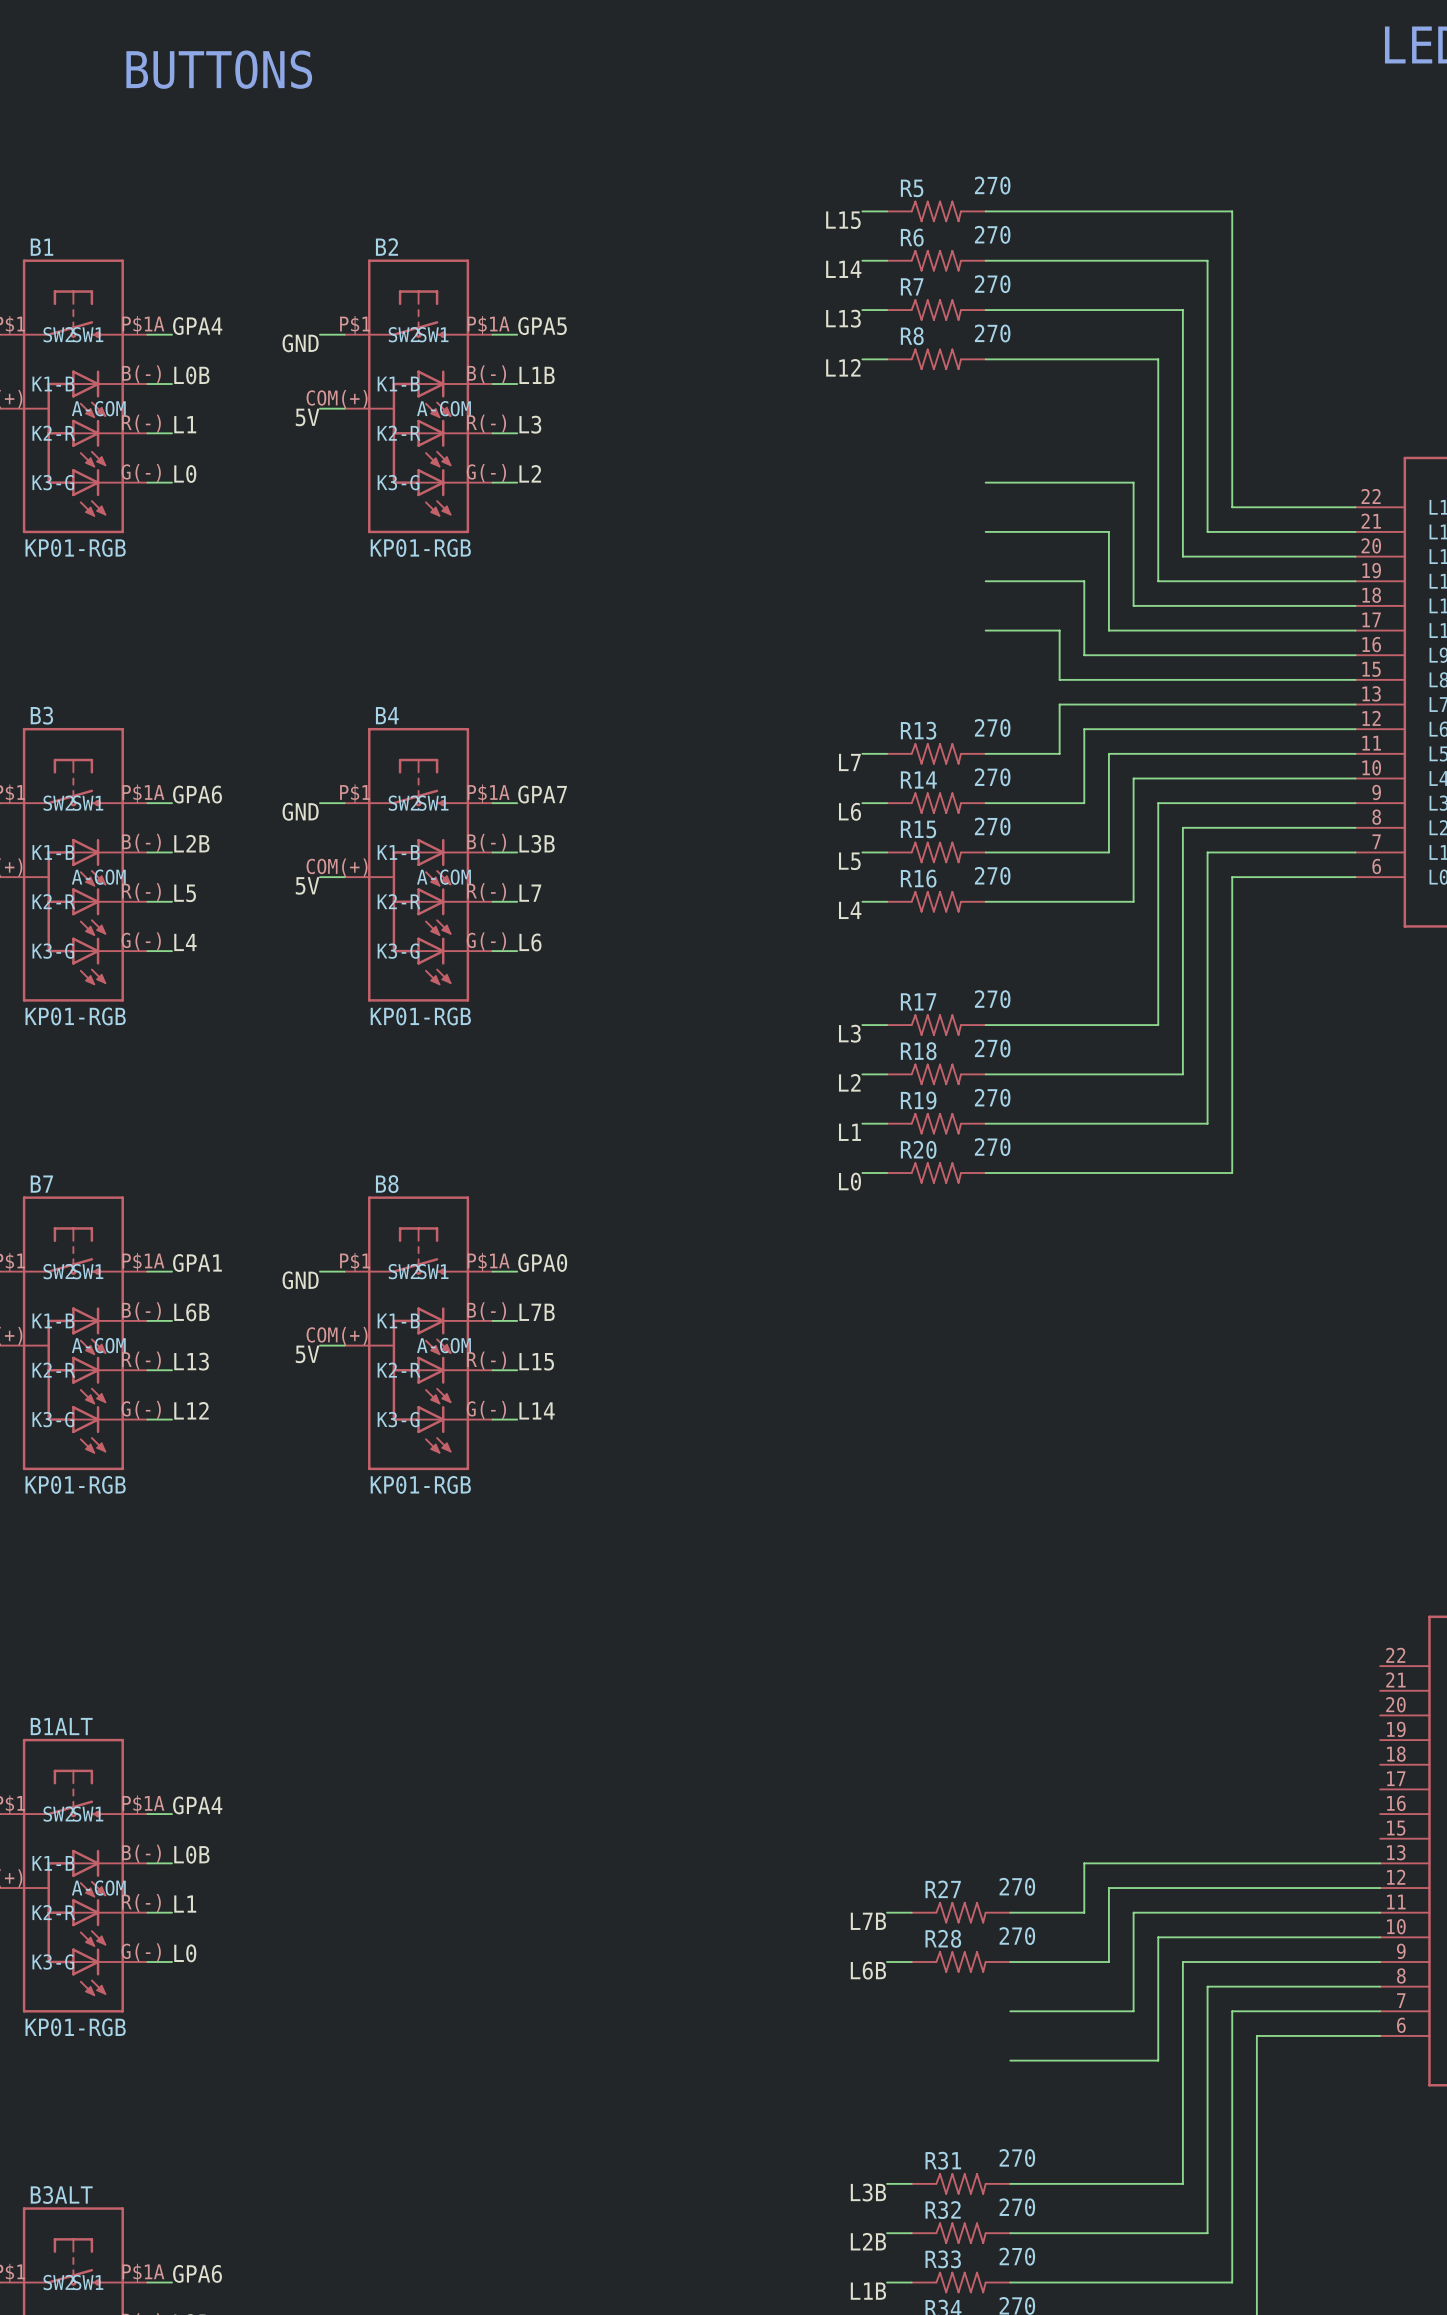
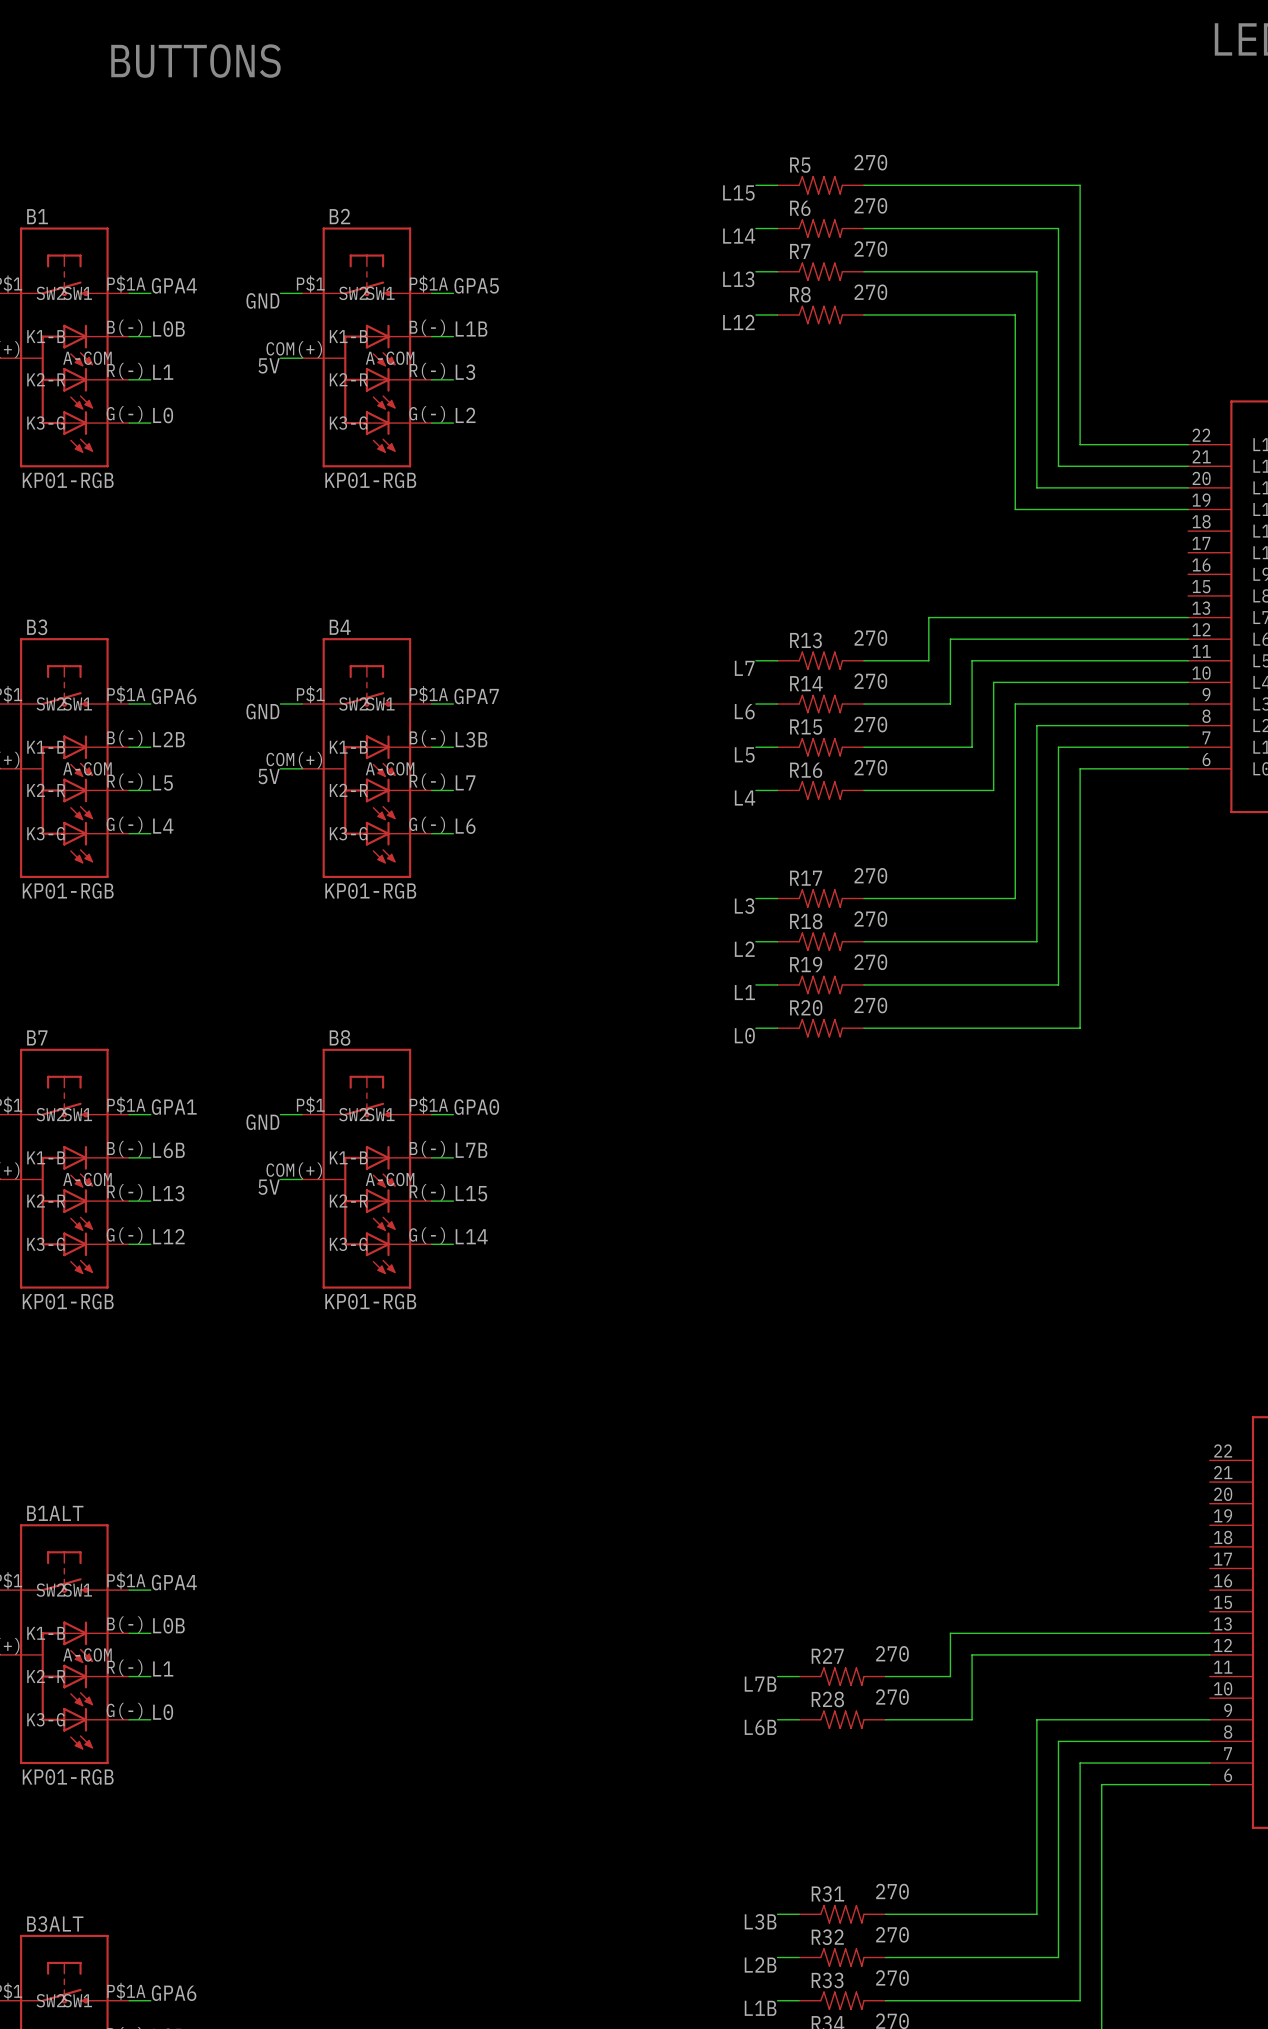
wire: (985, 482) (1133, 482) (1133, 605) (1355, 605) -> none
wire: (985, 531) (1108, 531) (1108, 630) (1355, 630) -> none
wire: (985, 581) (1084, 581) (1084, 655) (1355, 655) -> none
wire: (985, 630) (1059, 630) (1059, 679) (1355, 679) -> none
wire: (1380, 1912) (1133, 1912) (1133, 2011) (1010, 2011) -> none
wire: (1380, 1937) (1158, 1937) (1158, 2060) (1010, 2060) -> none

